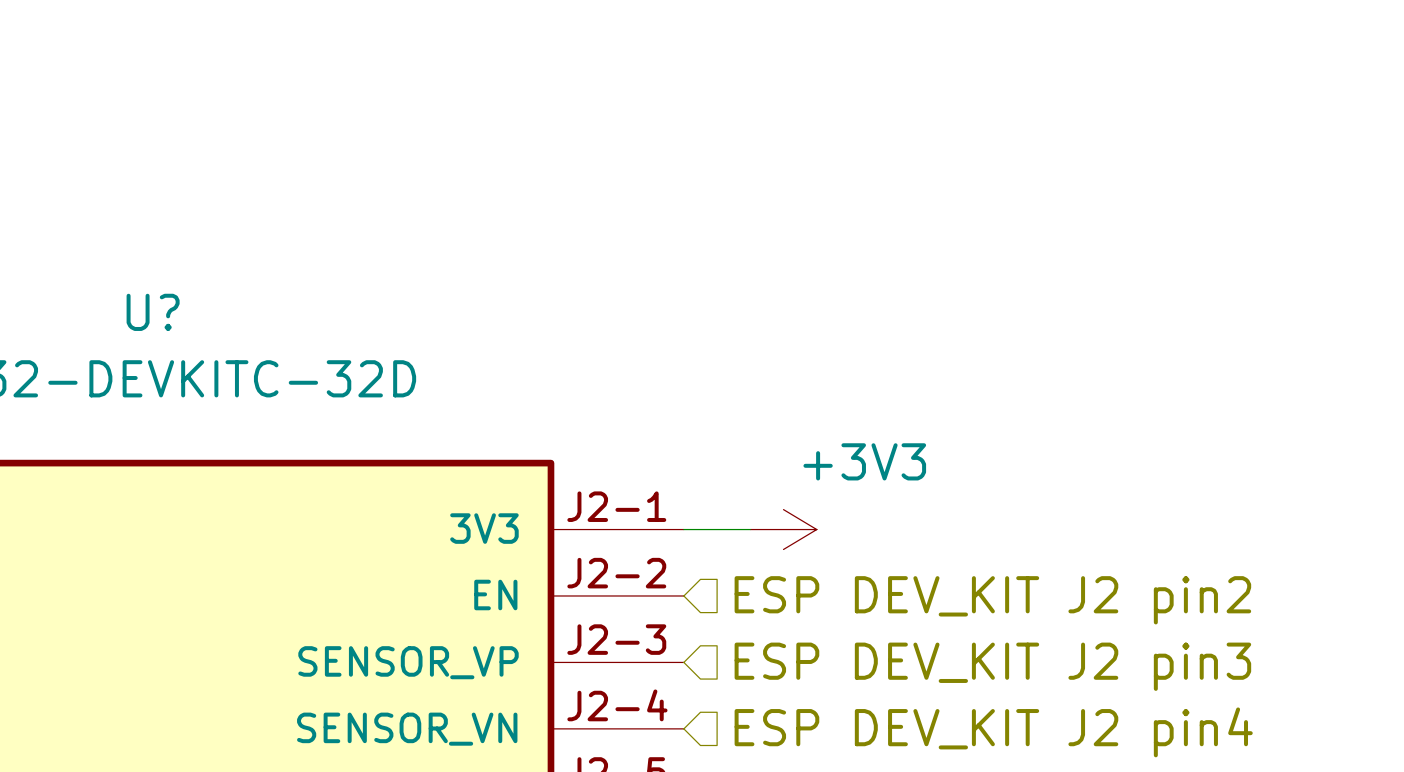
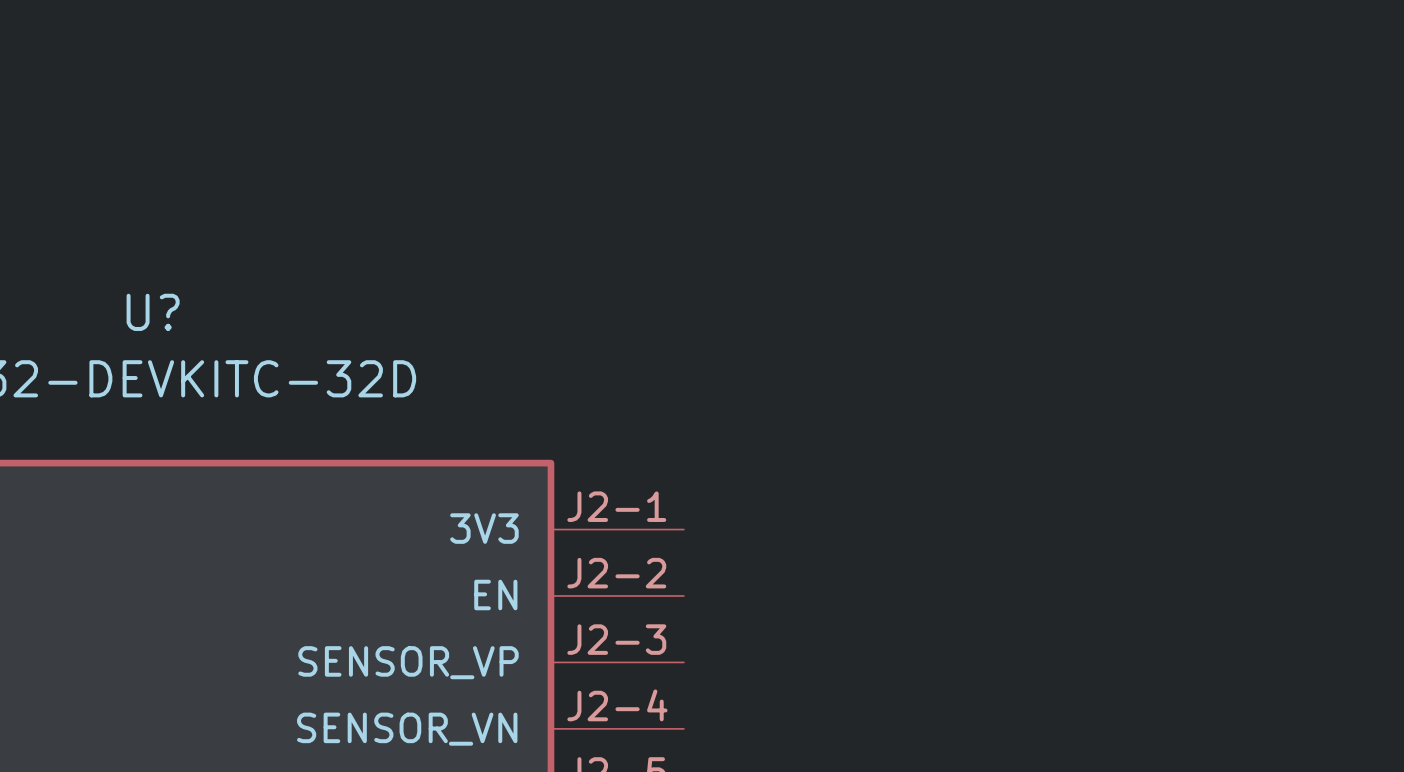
wire: (683, 529) (750, 529) -> none
power symbol: +3V3 (783, 529) -> none
hierarchical label: ESP DEV_KIT J2 pin2 (992, 600) -> none
hierarchical label: ESP DEV_KIT J2 pin3 (992, 666) -> none
hierarchical label: ESP DEV_KIT J2 pin4 (993, 732) -> none

